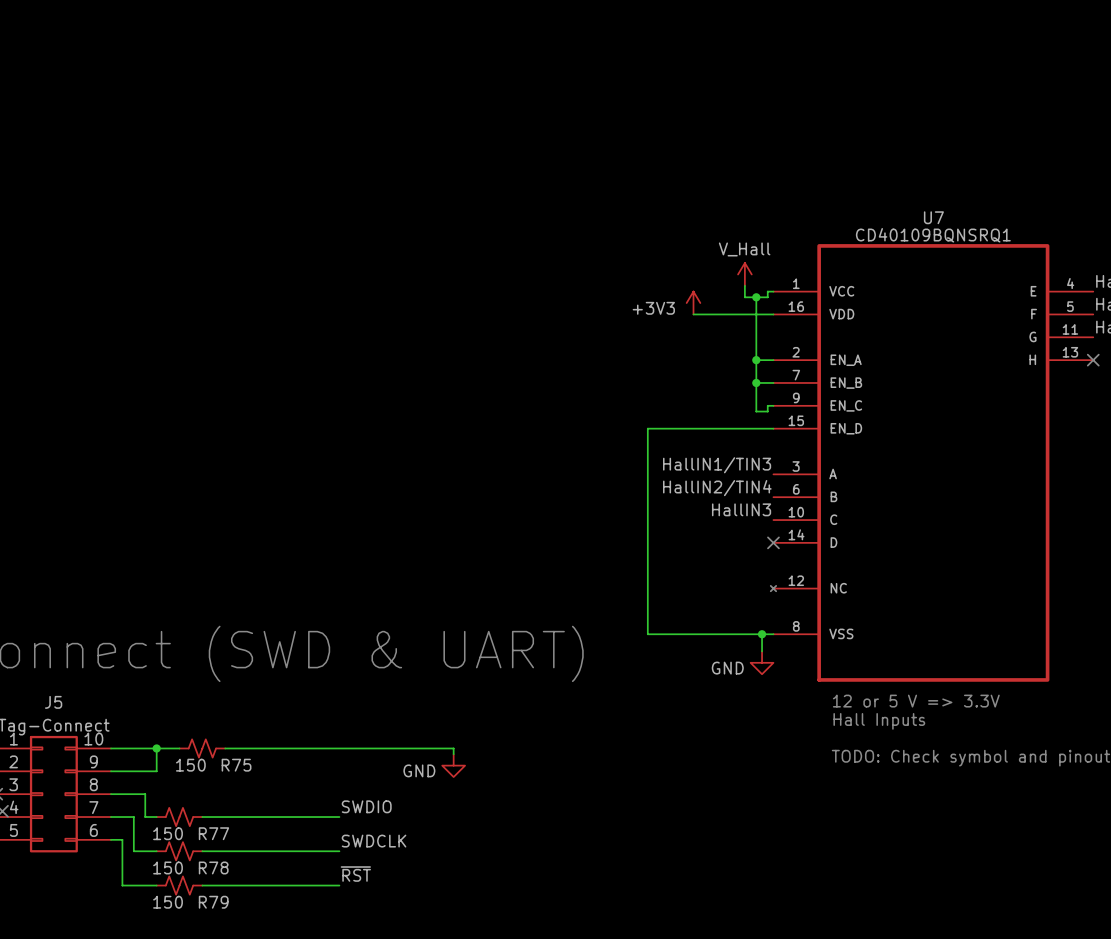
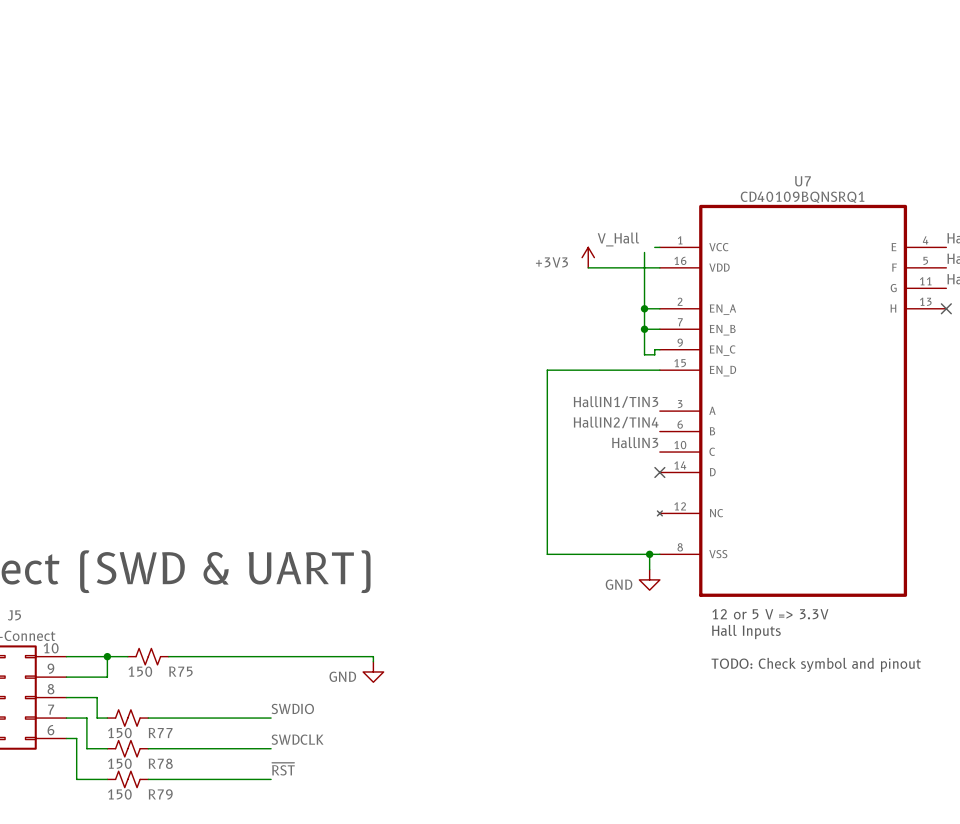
power symbol: V_Hall (744, 274) -> none
label: none -> V_Hall (618, 239)
wire: (744, 285) (744, 297) (767, 297) (767, 291) -> none
junction: (756, 297) -> none

